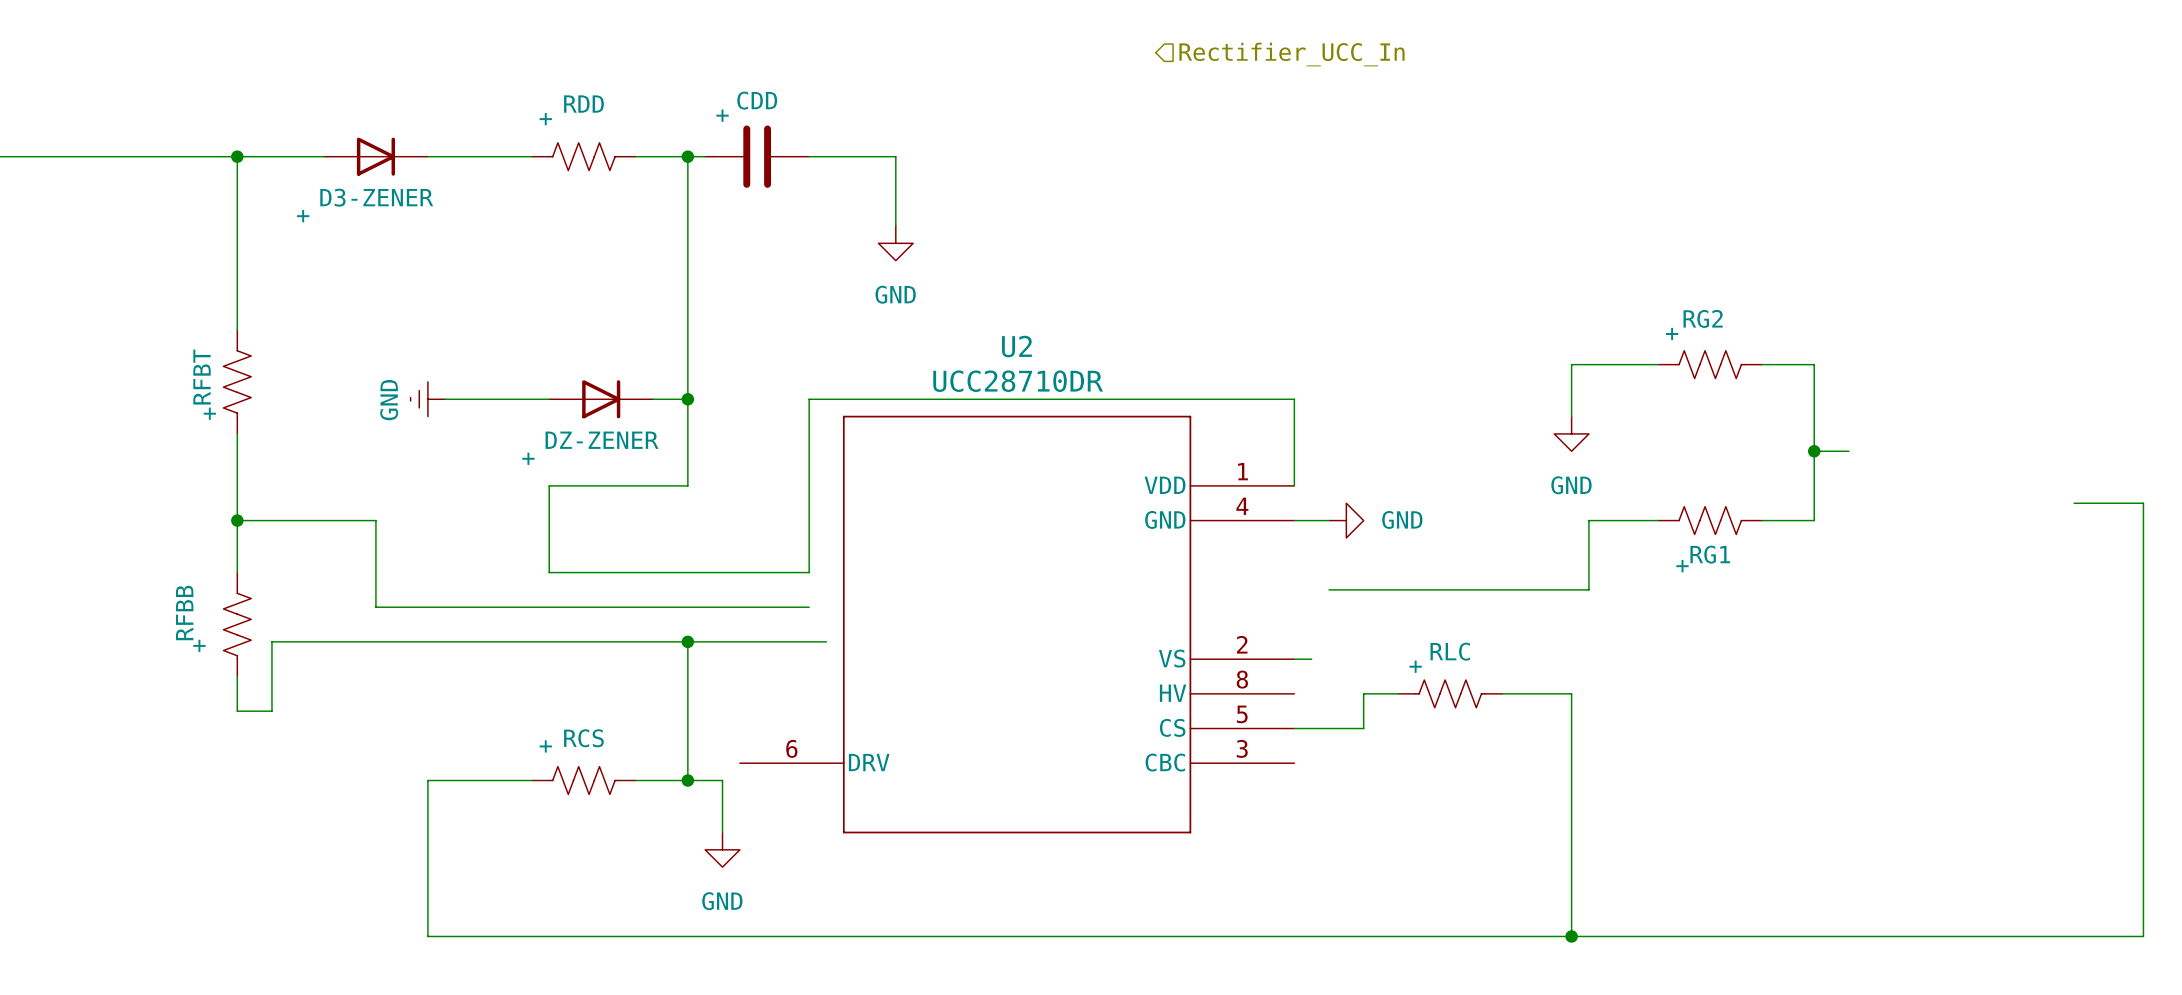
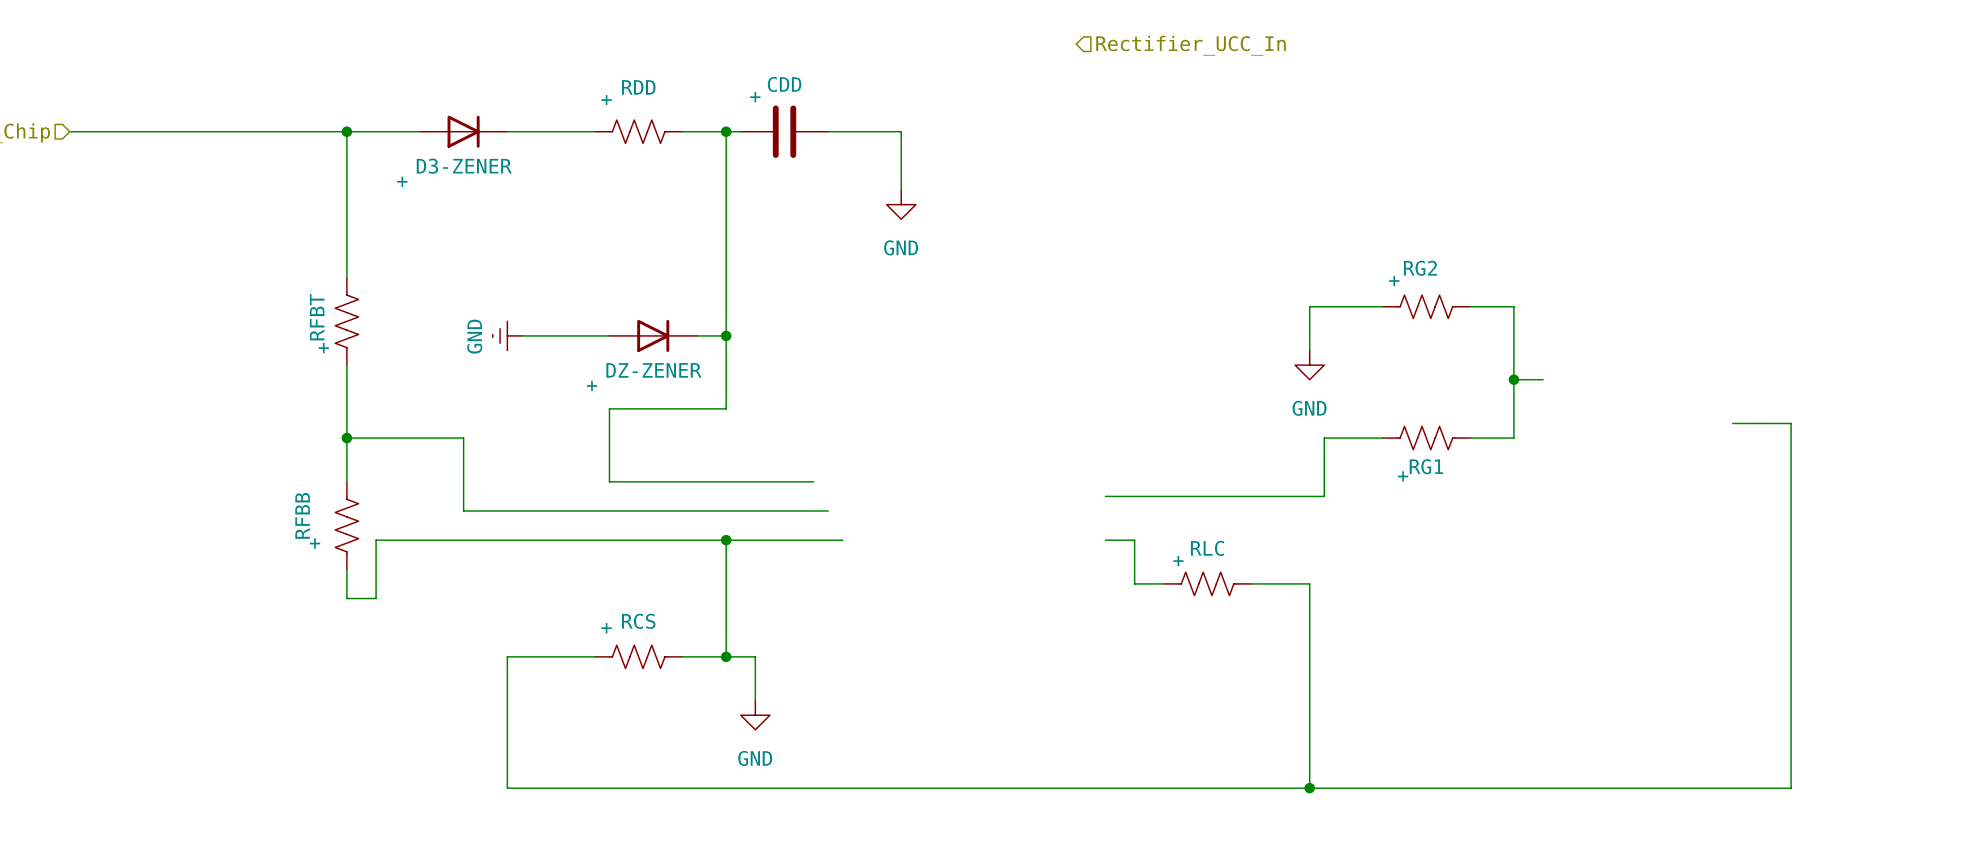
hierarchical label position: Rectifier_UCC_In (1291, 54) -> Rectifier_UCC_In (1190, 45)
wire: none -> (1382, 306) (1309, 306) (1309, 350)
wire: (1571, 364) (1571, 416) -> none
wire: (1623, 364) (1658, 364) -> (1513, 306) (1513, 438)
part position: (1710, 364) -> (1426, 306)
wire: (1762, 364) (1814, 364) (1814, 520) (1762, 520) -> none
power symbol: GND (1571, 433) -> none
junction: none -> (1513, 379)
wire: (1814, 451) (1848, 451) -> none
junction: (1814, 451) -> none
wire: (1294, 485) (1294, 399) (809, 399) (809, 572) (791, 572) -> none
wire: (2074, 503) (2143, 503) (2143, 936) (1952, 936) -> (1732, 423) (1791, 423) (1791, 788)
wire: (1294, 520) (1329, 520) -> none
power symbol rotation: 0° (1346, 520) -> 90° clockwise (1309, 365)
power symbol position: GND (1346, 520) -> GND (1309, 365)
wire: (1588, 520) (1588, 589) (1398, 589) -> (1382, 438) (1324, 438) (1324, 496)
wire: (1623, 520) (1658, 520) -> (1513, 379) (1543, 379)
part position: (1710, 520) -> (1426, 438)
wire: none -> (1105, 496) (1265, 496)
U2: UCC28710DR (1017, 624) -> none
wire: none -> (1105, 540) (1134, 540) (1134, 583) (1163, 583)
wire: (1294, 659) (1311, 659) -> (1470, 438) (1484, 438)
wire: (1363, 693) (1363, 728) (1294, 728) -> (1295, 583) (1251, 583)
wire: (1381, 693) (1398, 693) -> (1309, 583) (1309, 788)
part position: (1450, 693) -> (1207, 583)
wire: (1502, 693) (1571, 693) (1571, 936) -> none
junction: none -> (1309, 788)
junction: (1571, 936) -> none

